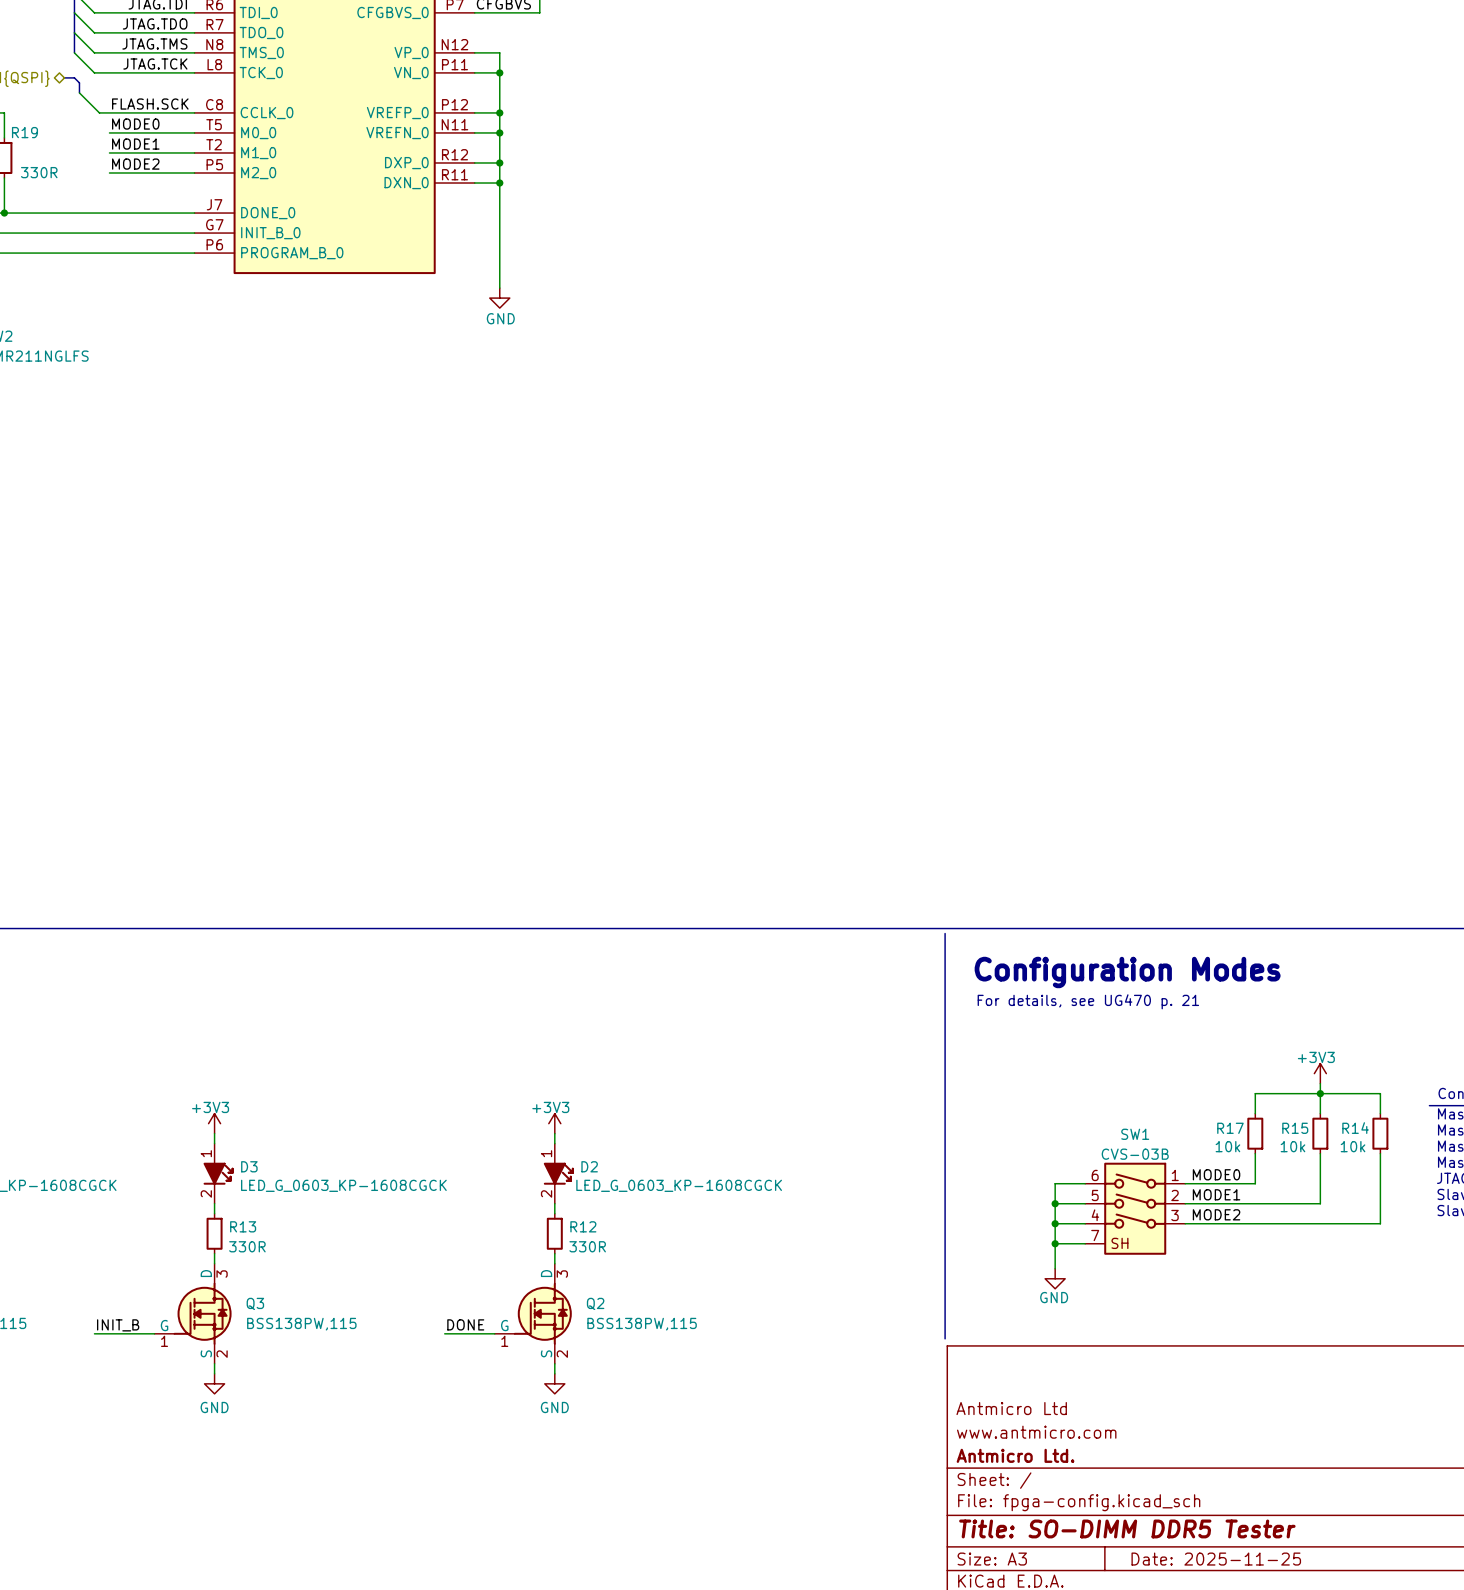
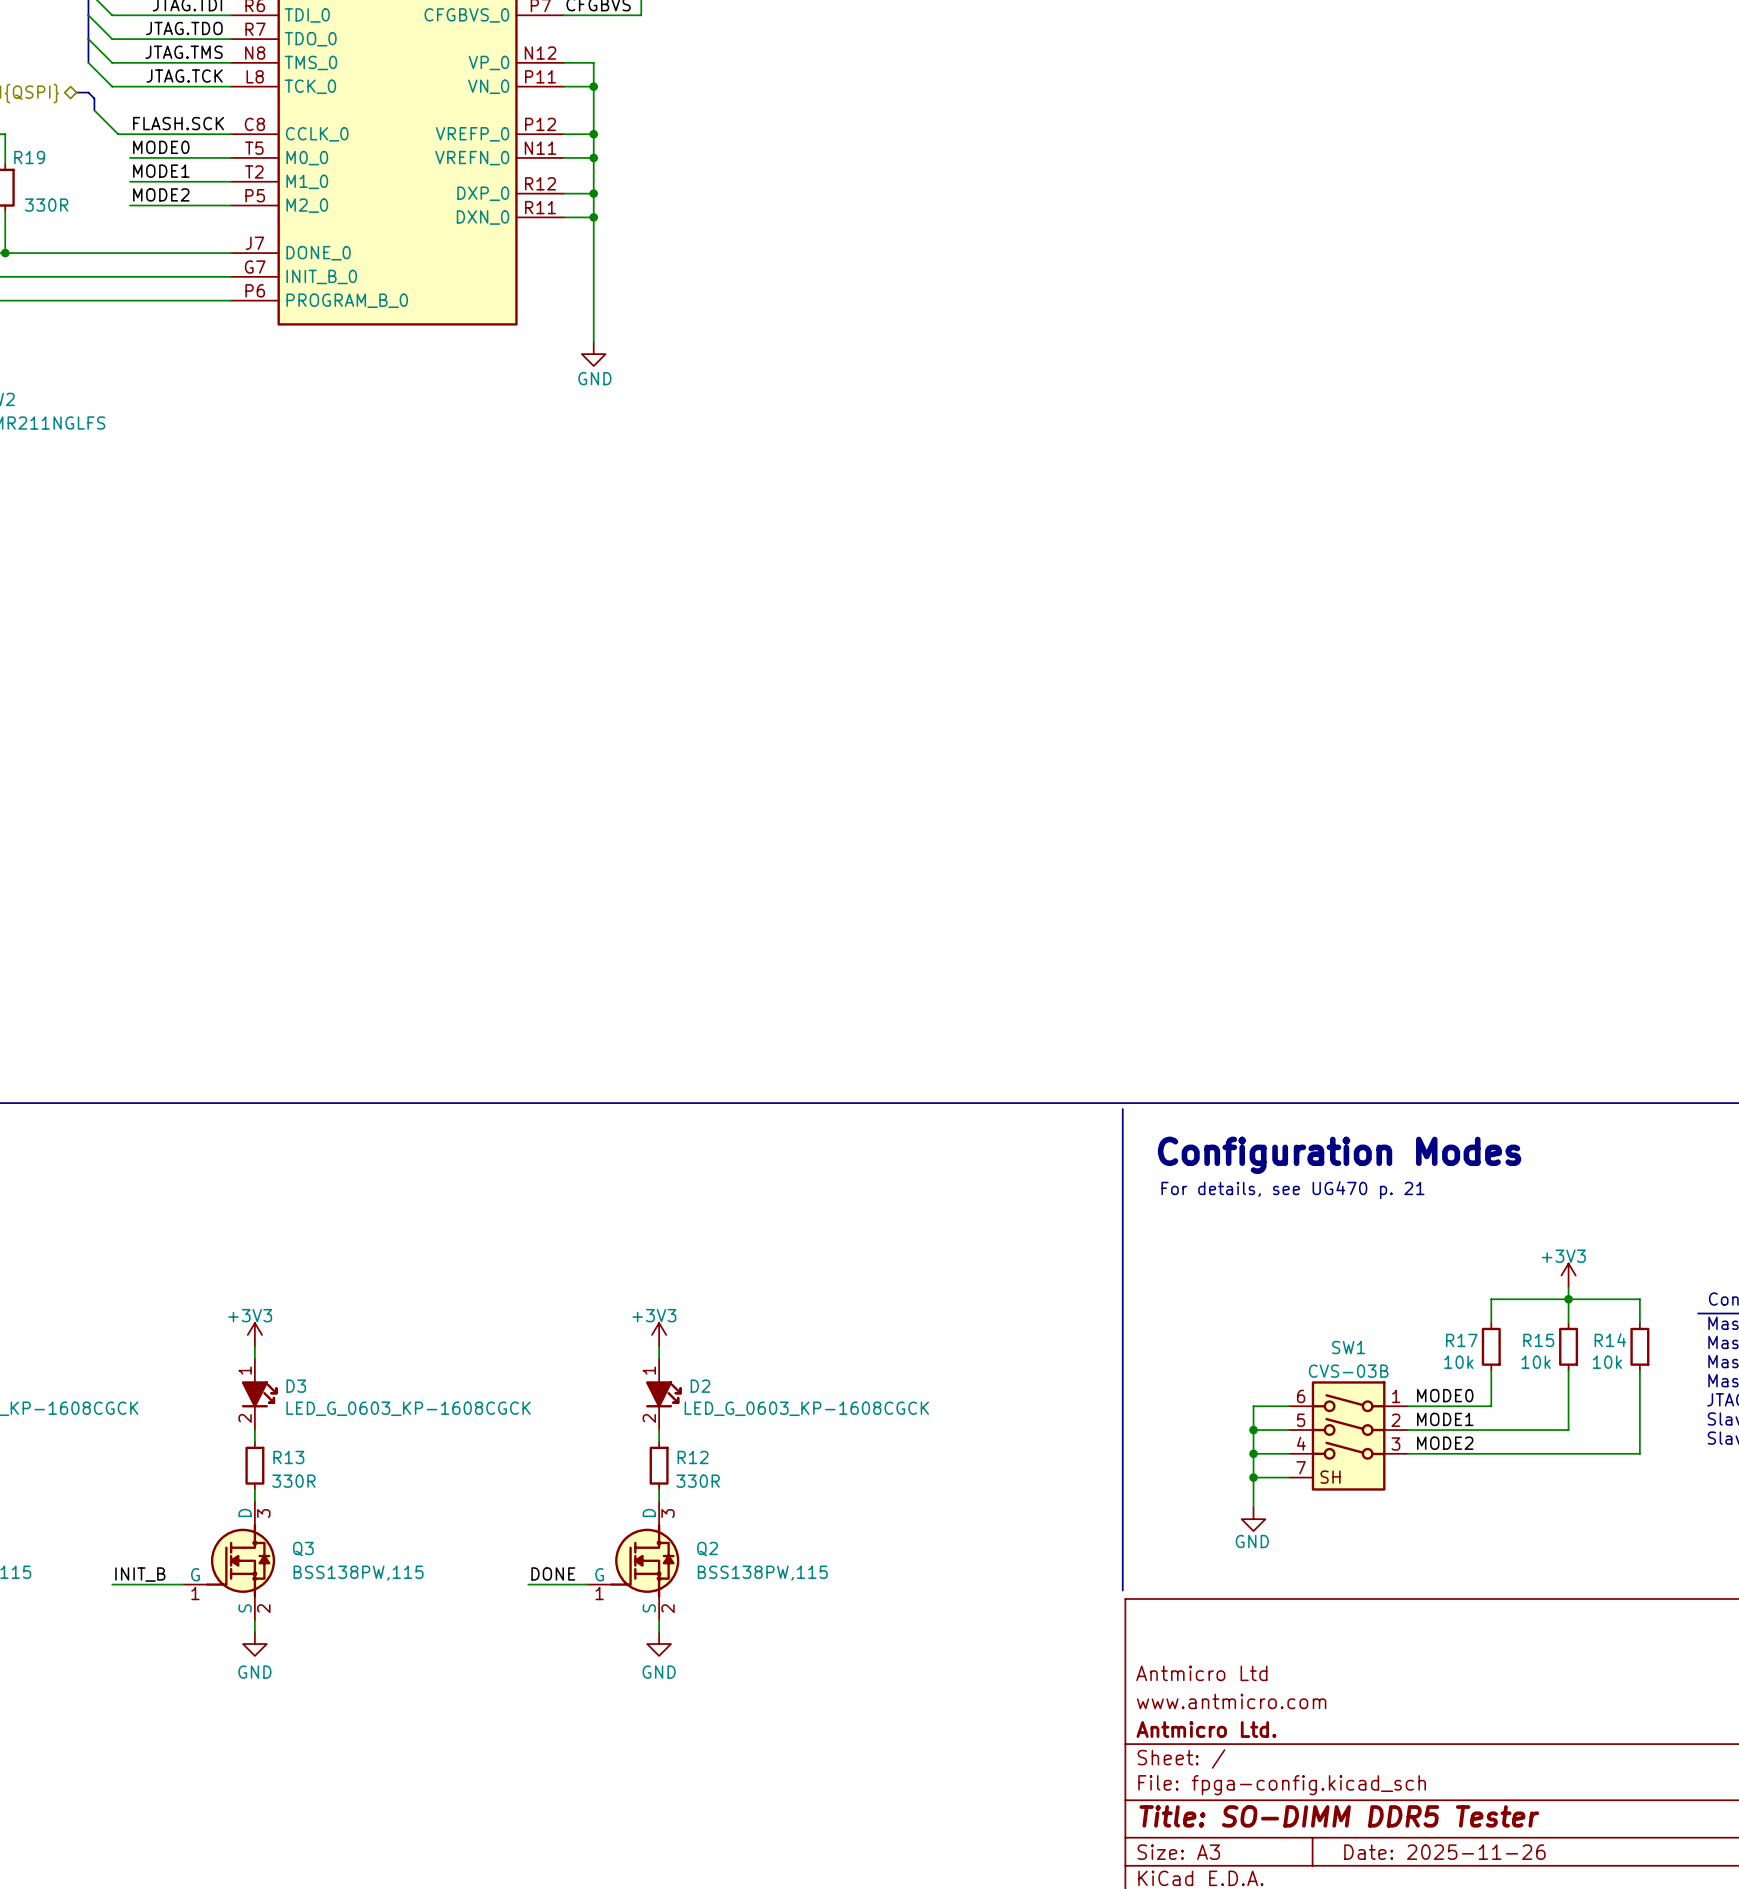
title block: Date: 2025-11-25 (1216, 1559) -> Date: 2025-11-26 (1444, 1852)

